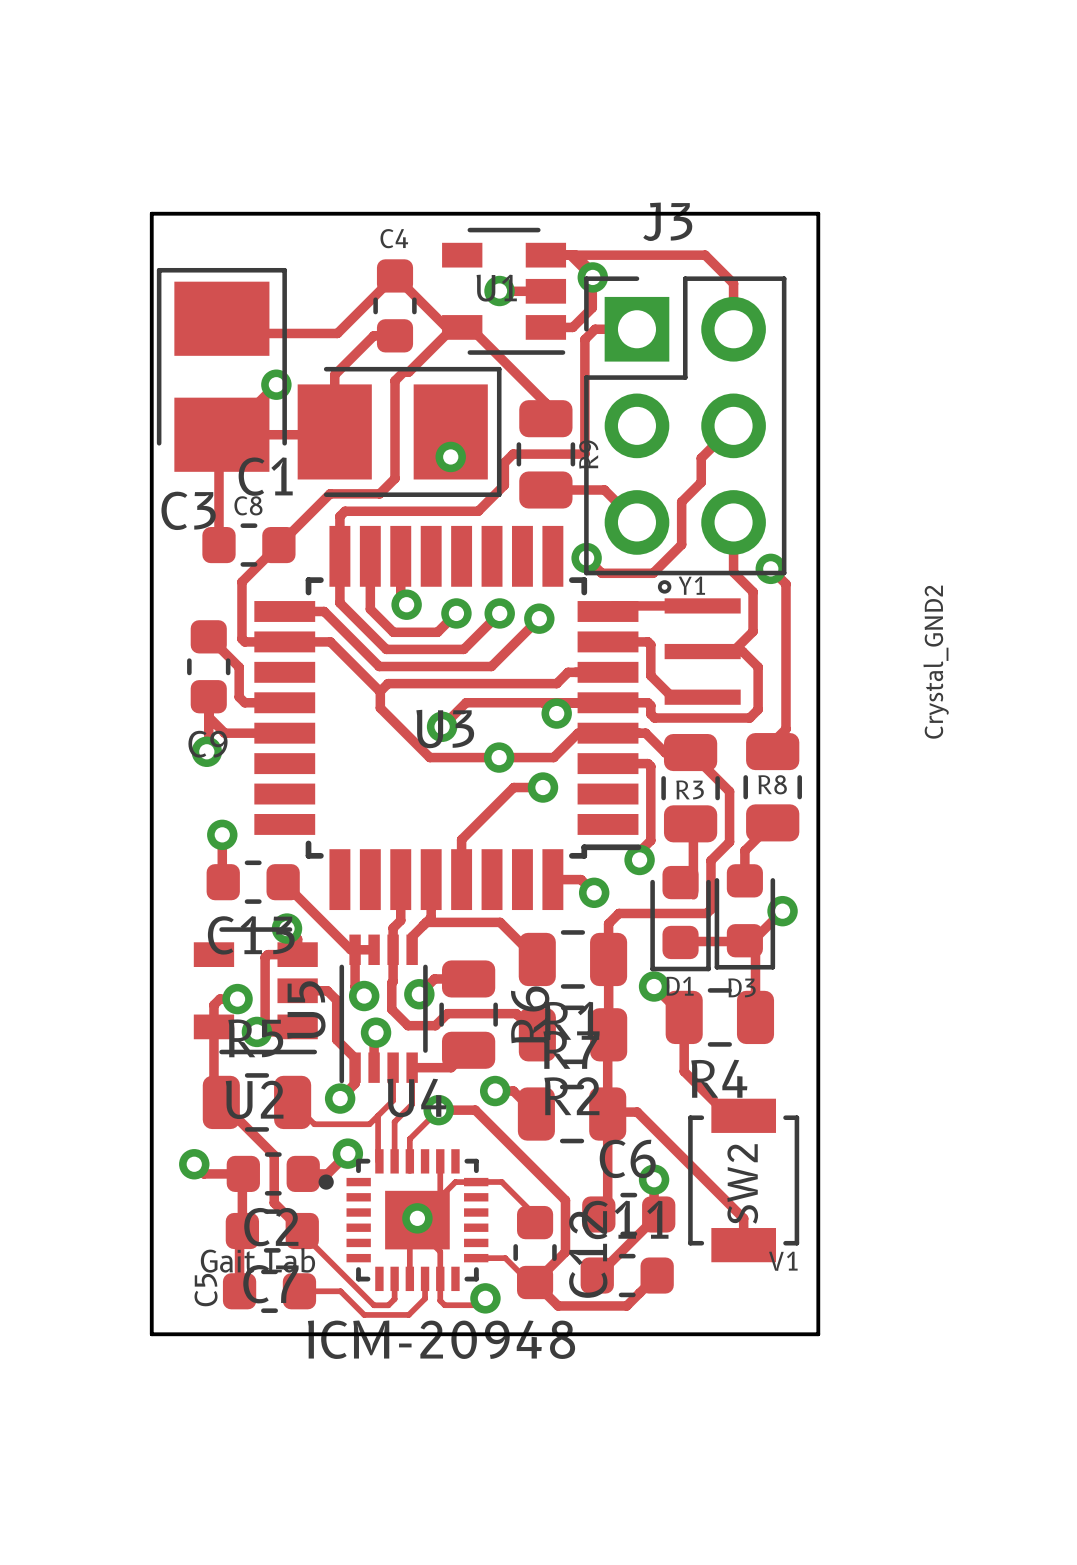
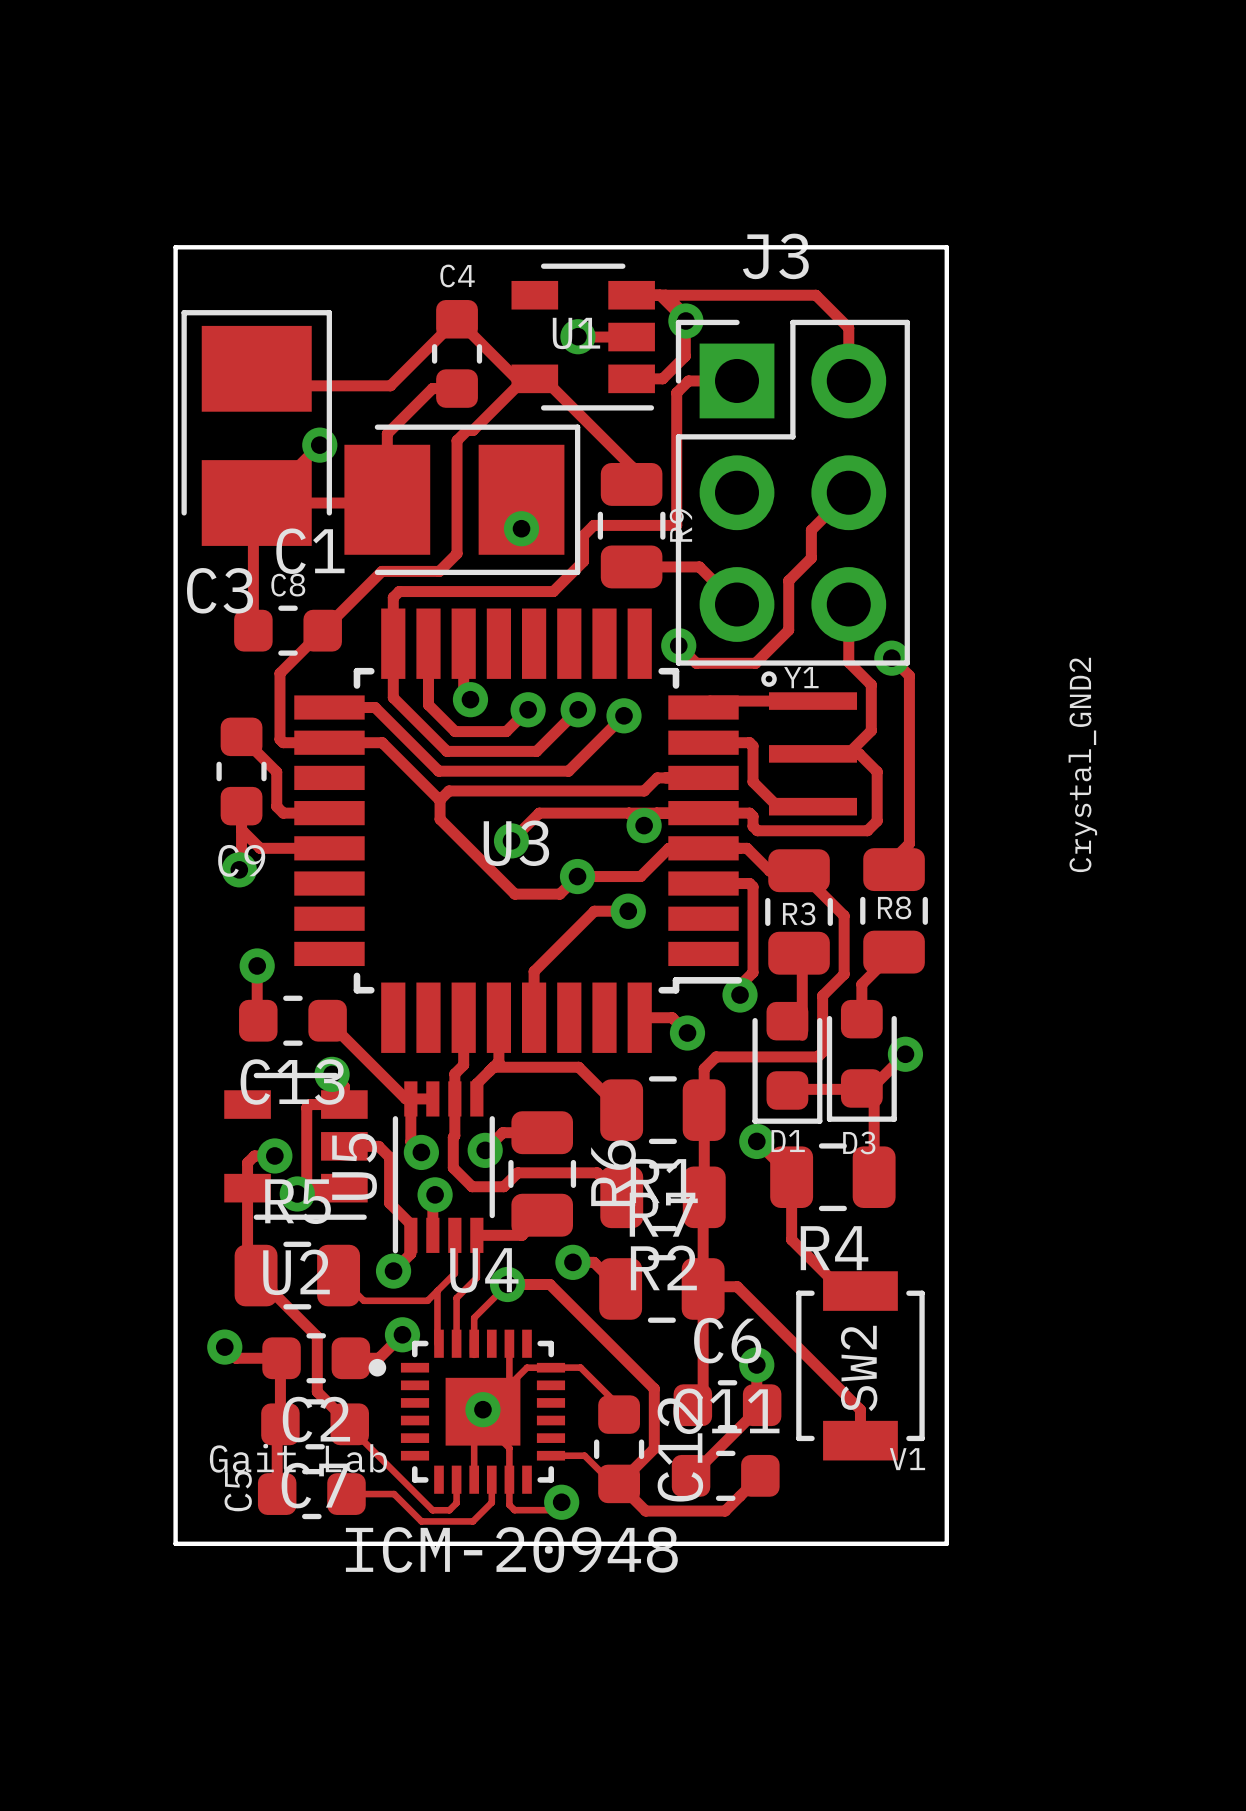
track: (429, 757) (499, 757) -> (497, 876) (514, 894) (559, 894) (577, 876)

